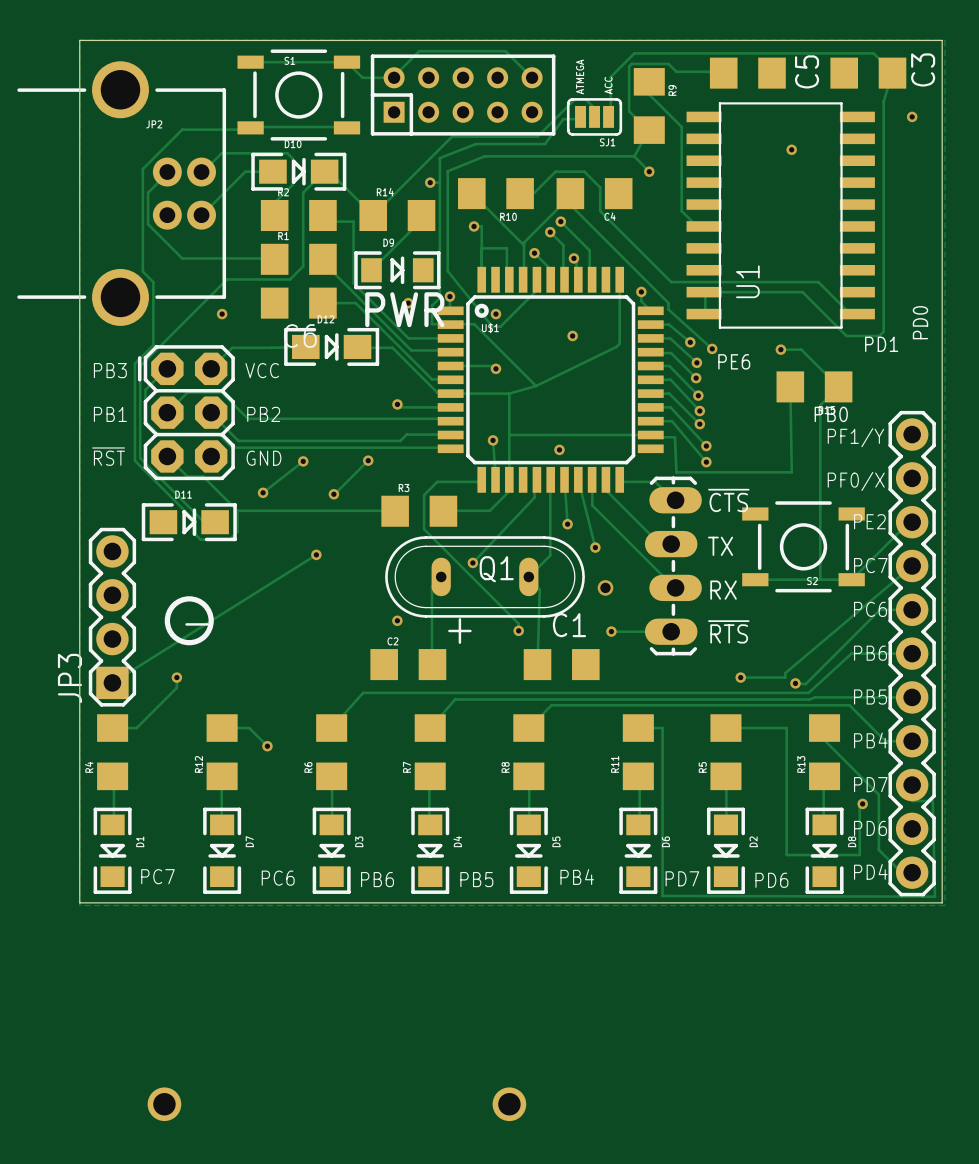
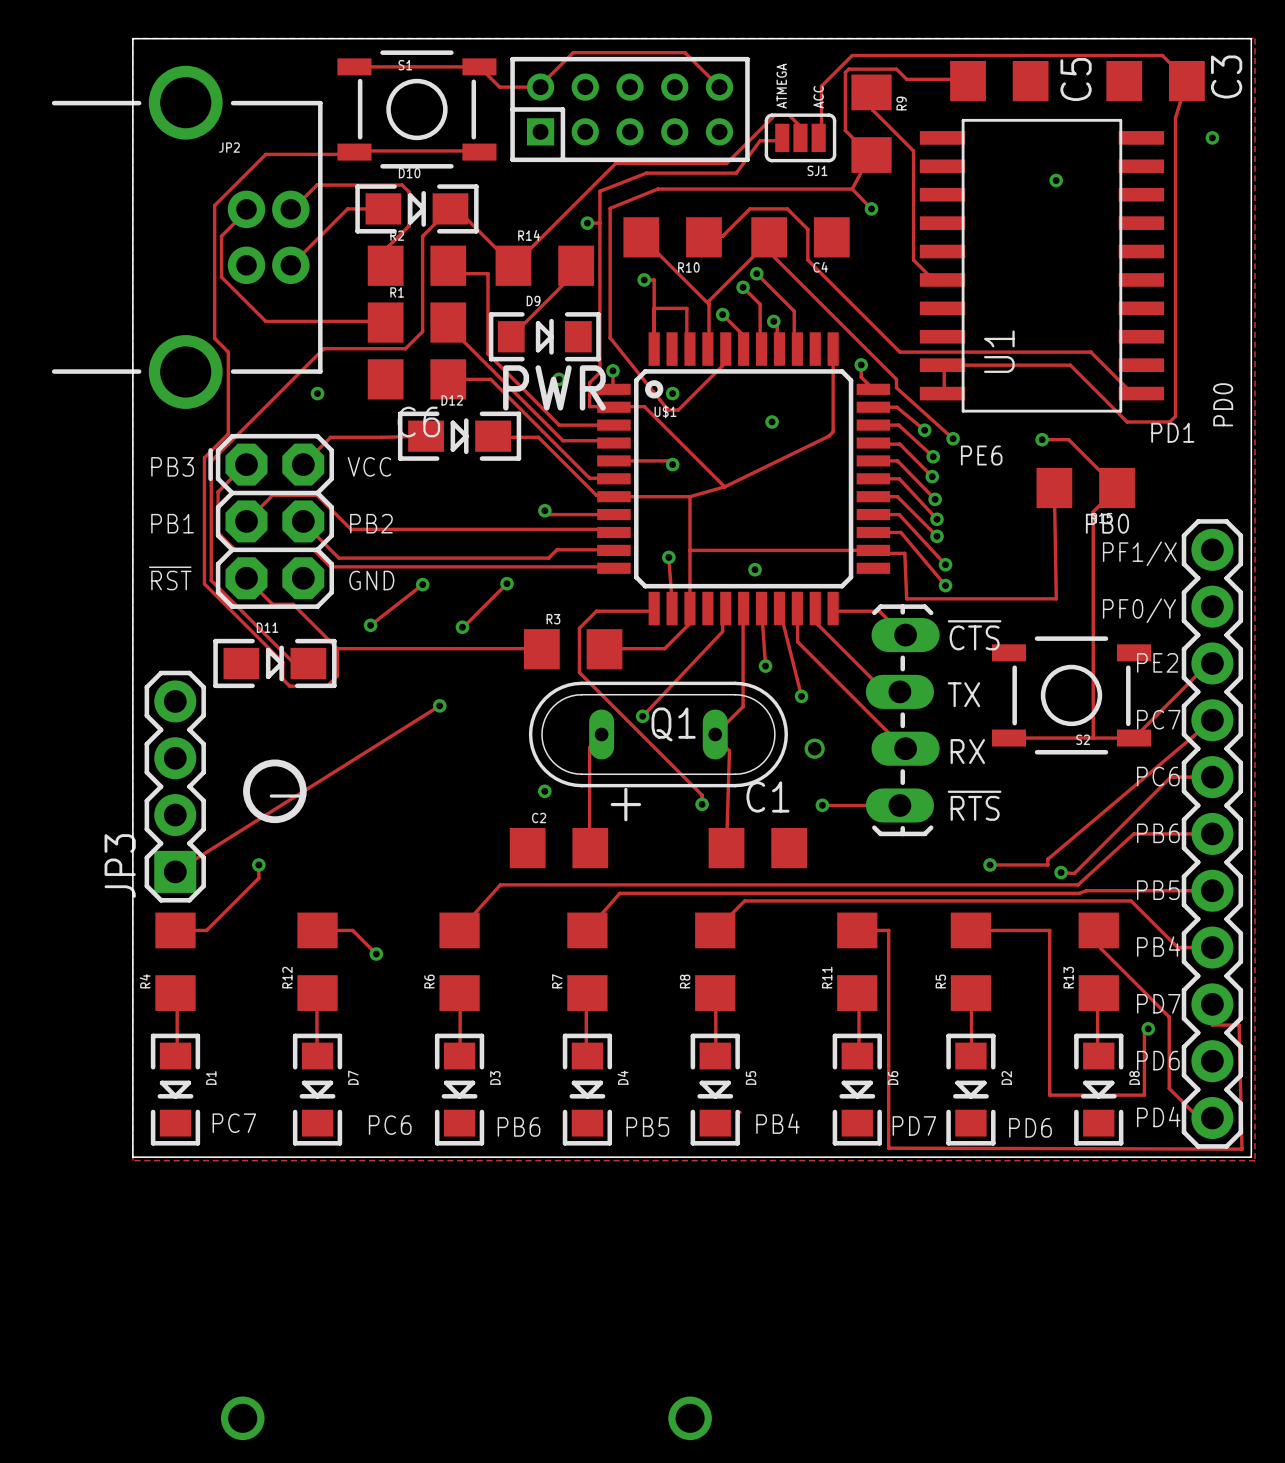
text: PF1/Y (855, 437) -> PF1/X (1139, 553)
text: PF0/X (856, 481) -> PF0/Y (1139, 610)

